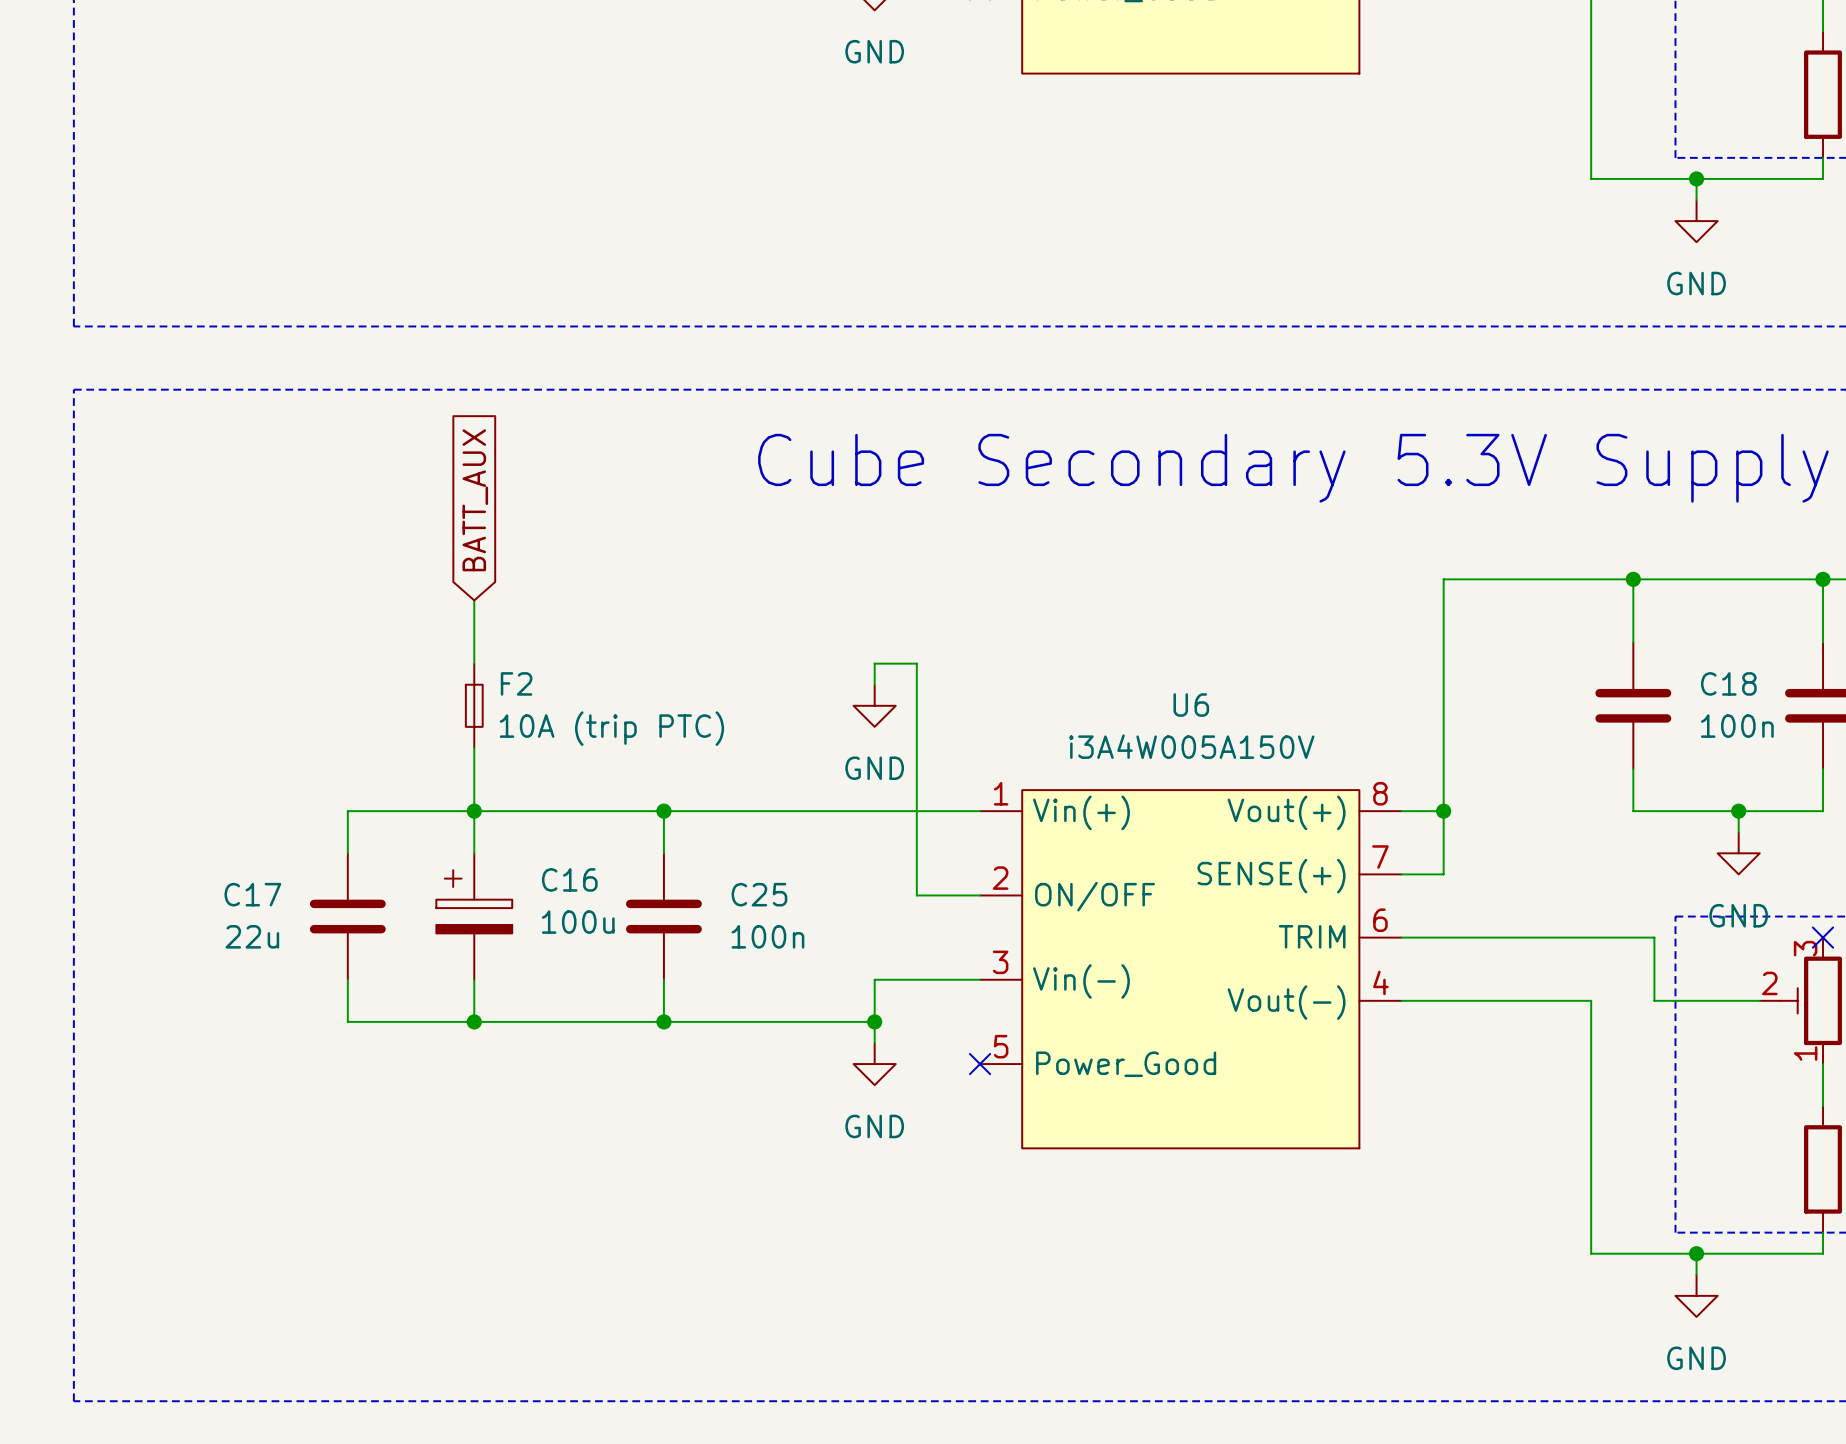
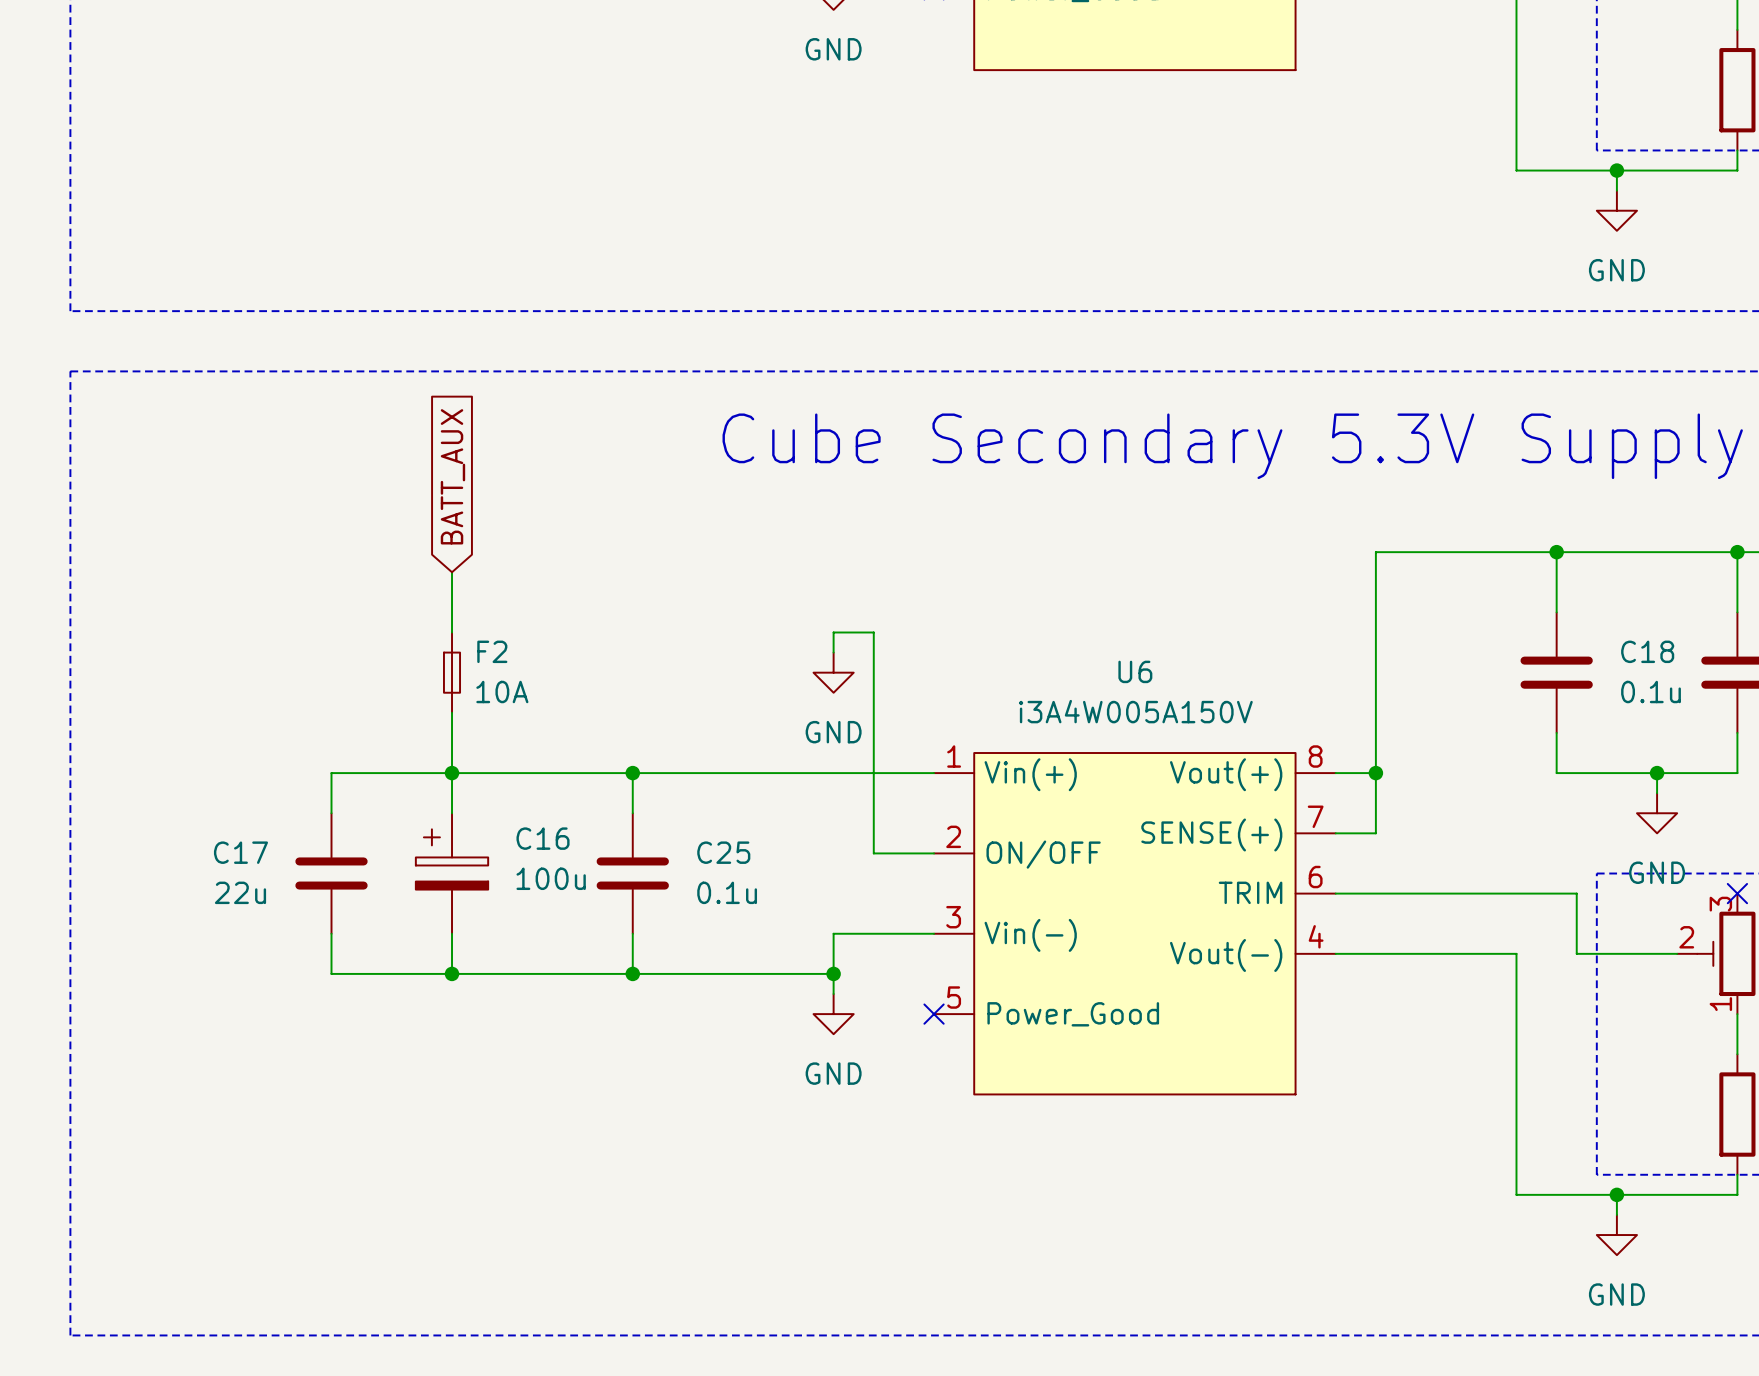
C18 value: 100n (1737, 726) -> 0.1u (1651, 691)
F2 value: 10A (trip PTC) (611, 728) -> 10A (502, 691)
C25 value: 100n (767, 936) -> 0.1u (727, 892)

